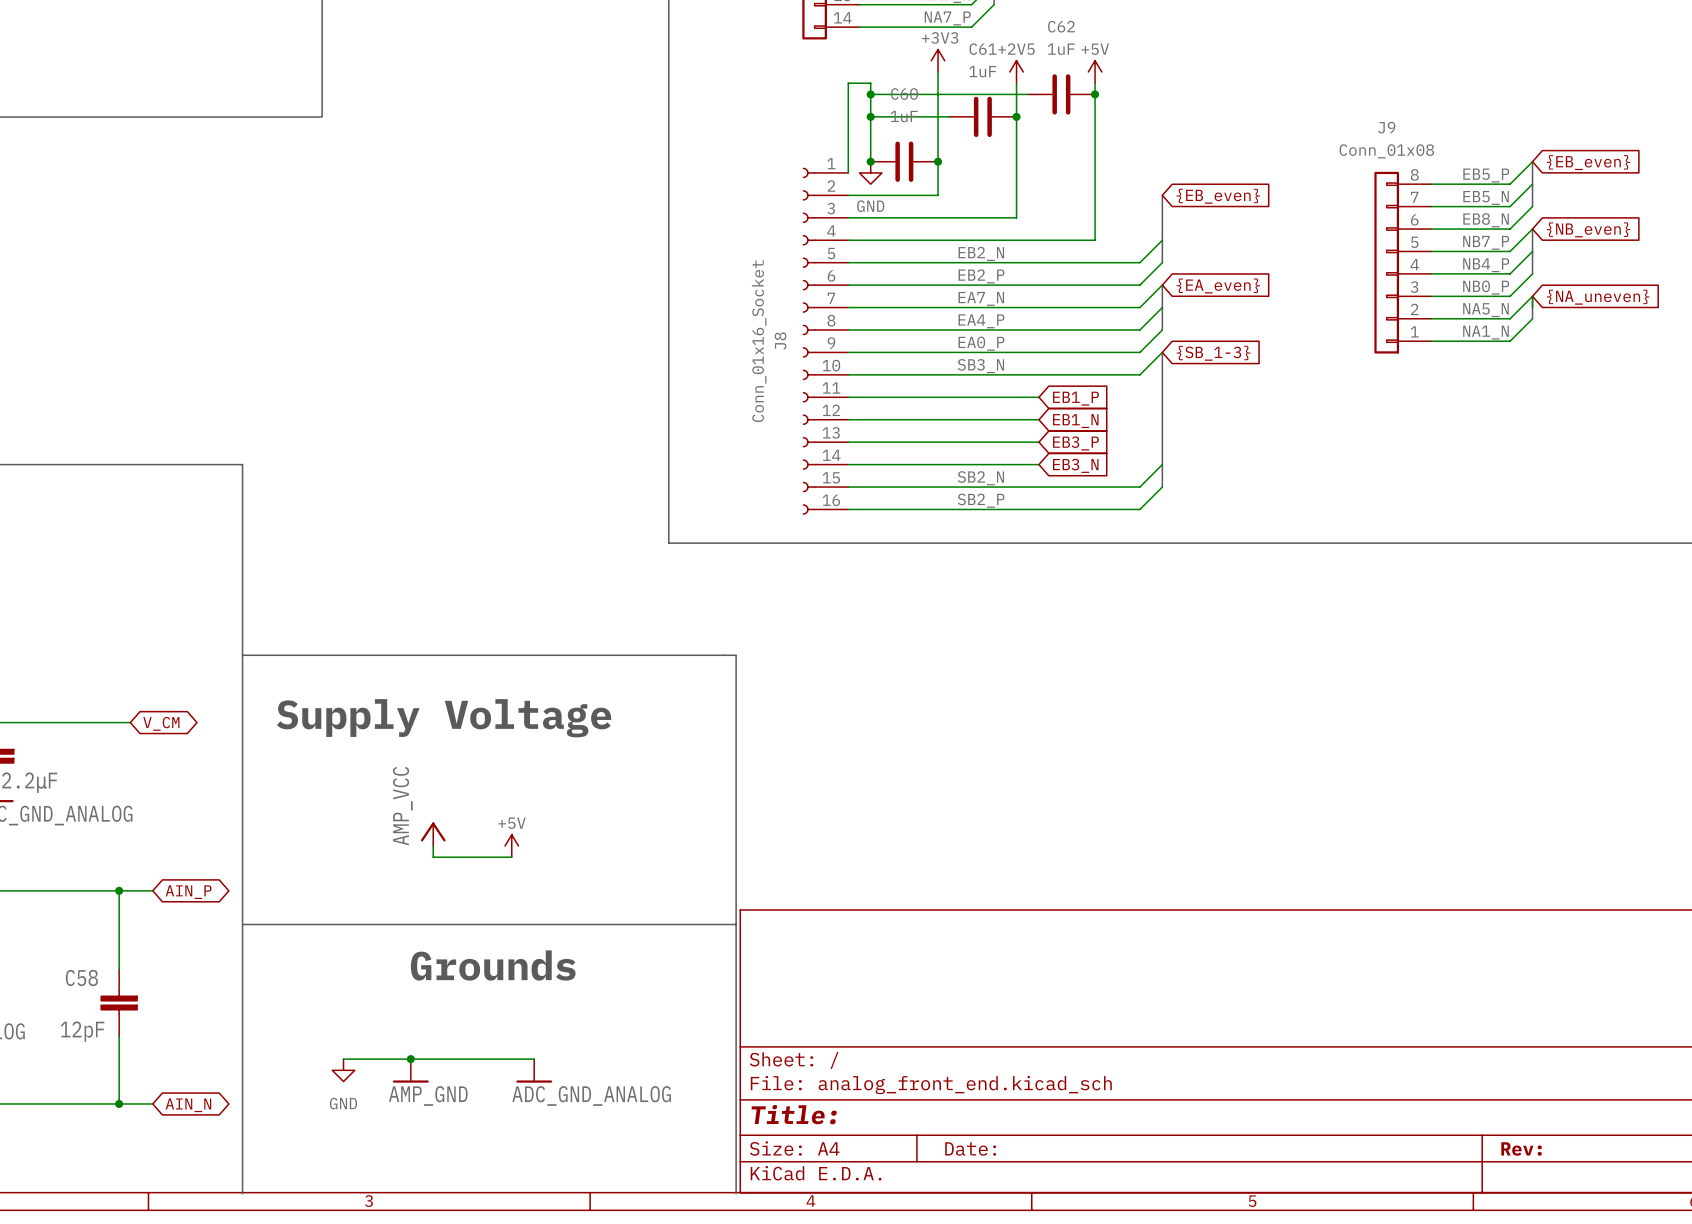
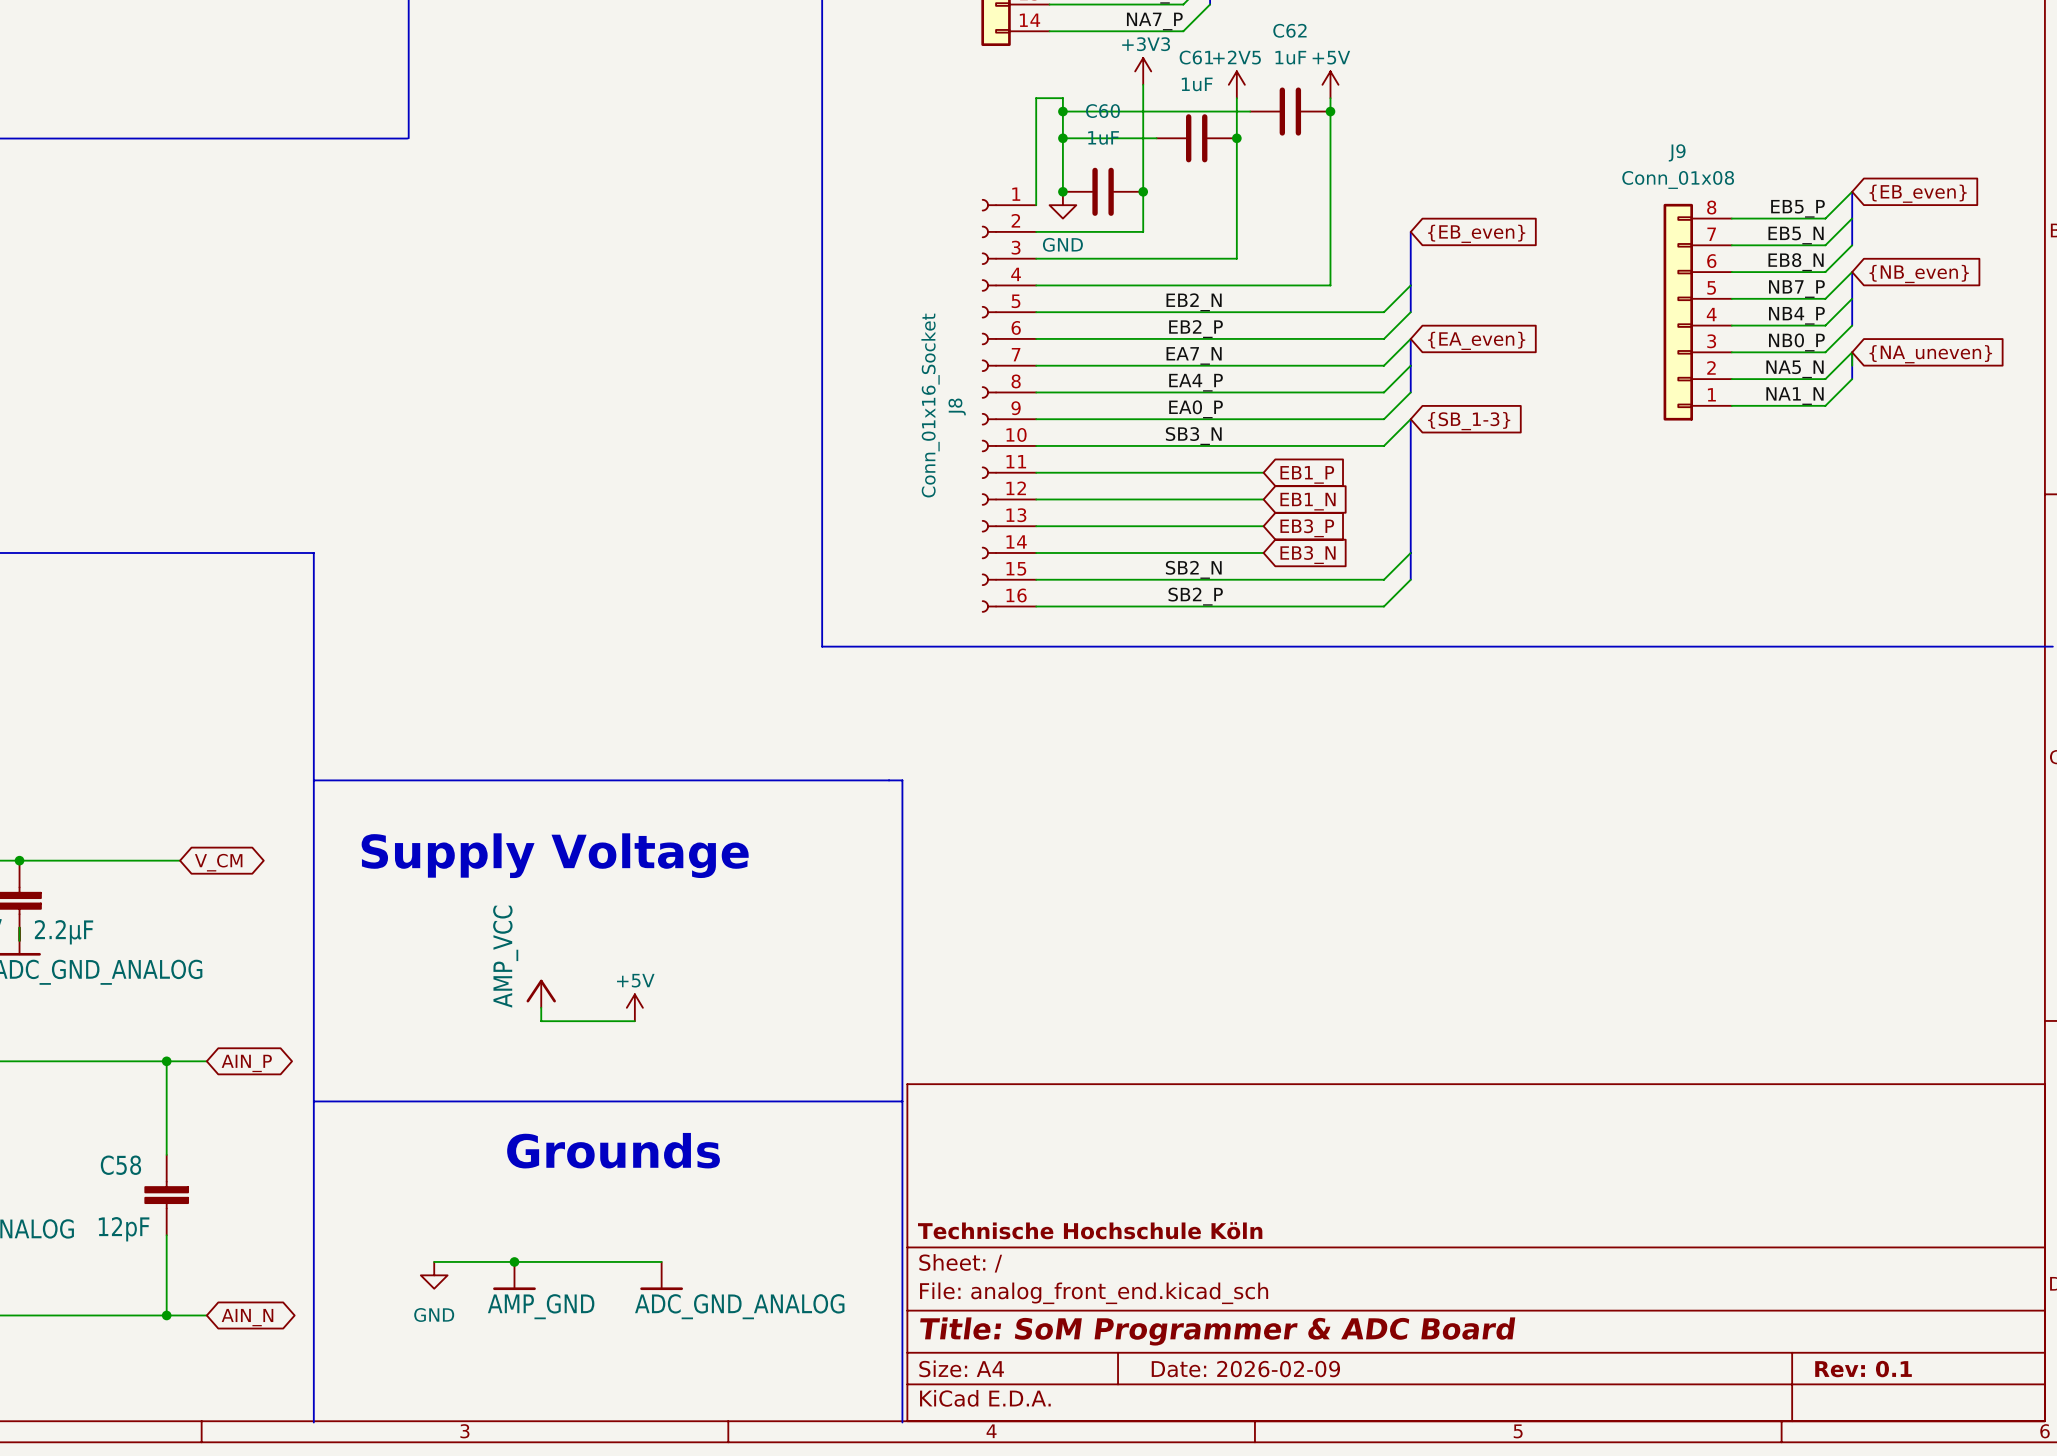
title block: none -> Technische Hochschule Köln (1090, 1230)
title block: Title: (794, 1114) -> Title: SoM Programmer & ADC Board (1217, 1331)
title block: Date: (970, 1149) -> Date: 2026-02-09 (1245, 1369)
title block: Rev: (1521, 1149) -> Rev: 0.1 (1863, 1369)

